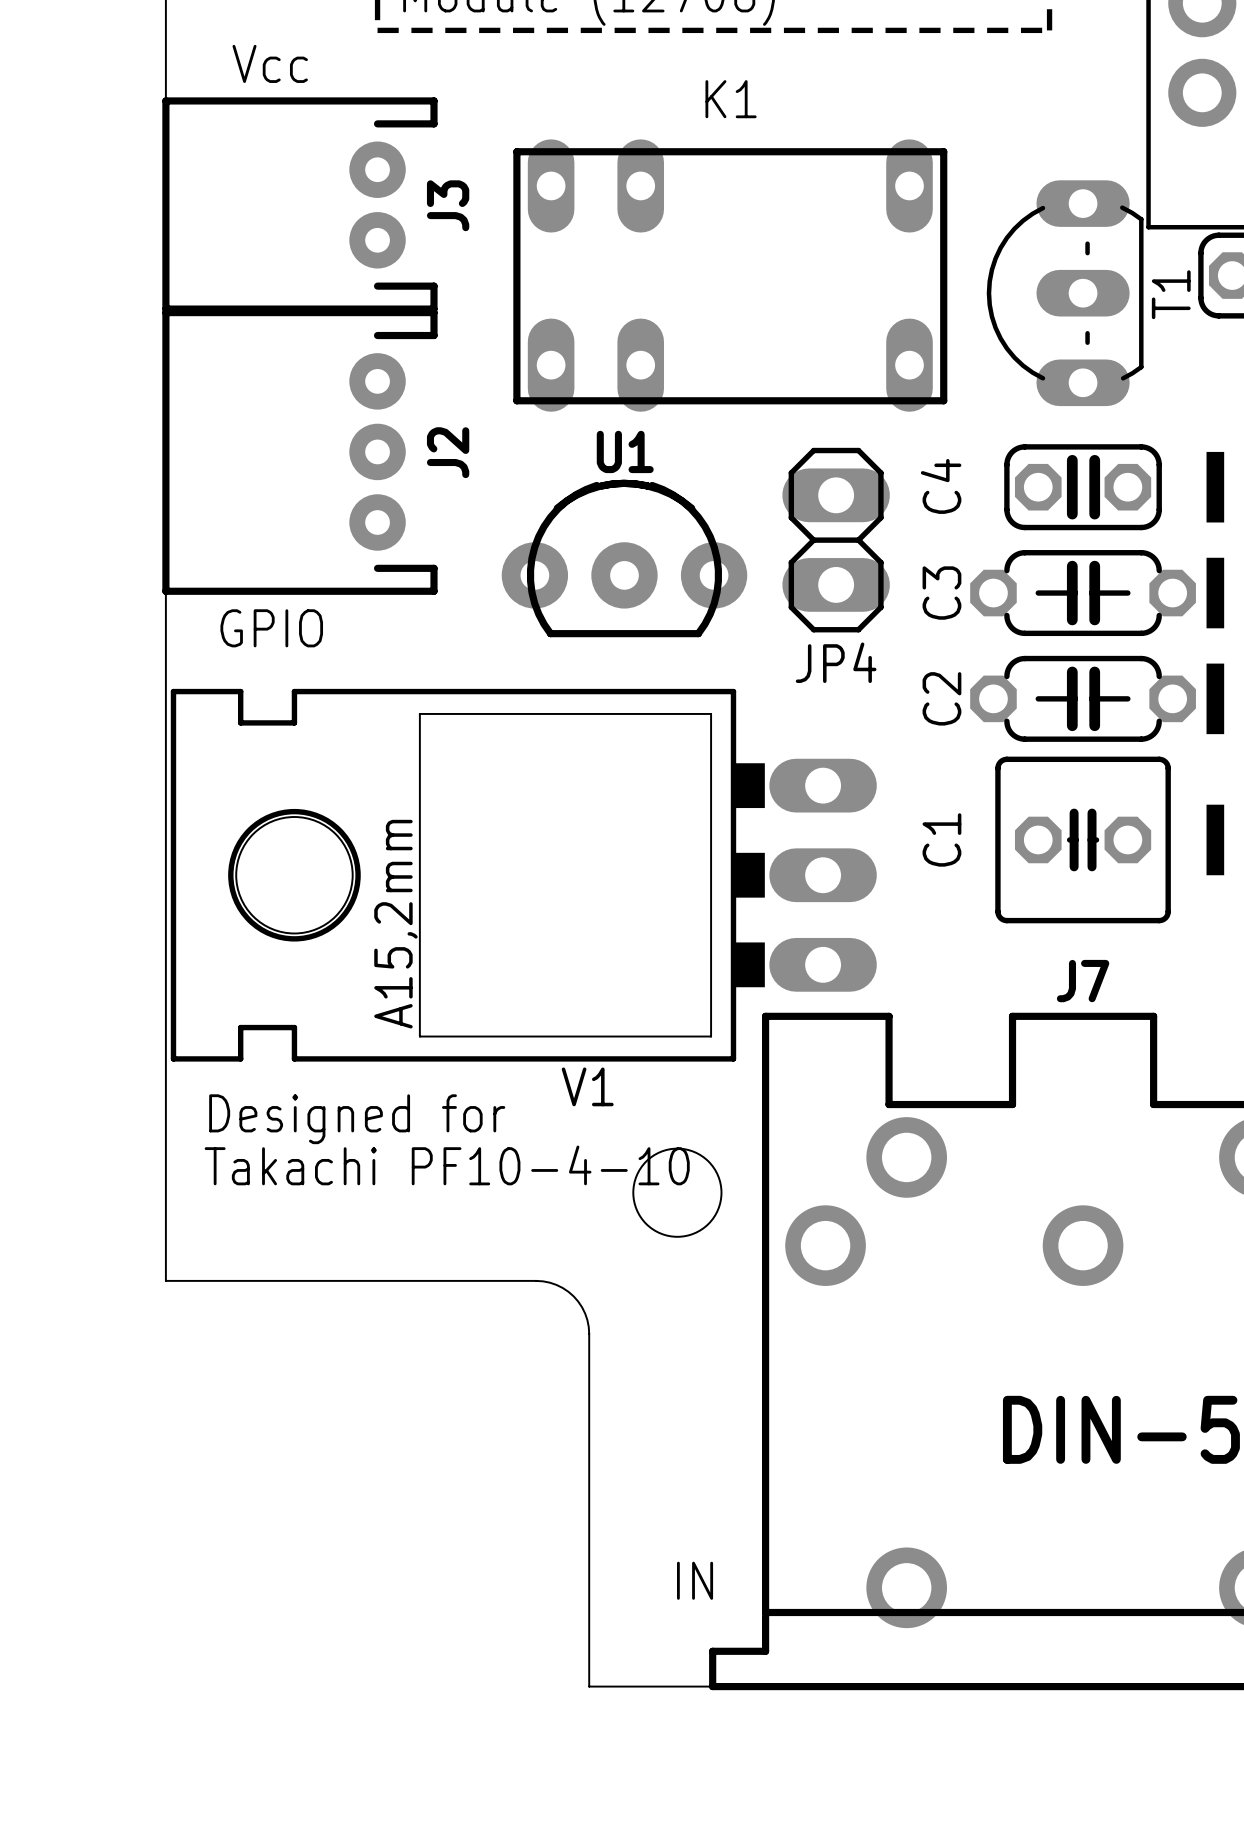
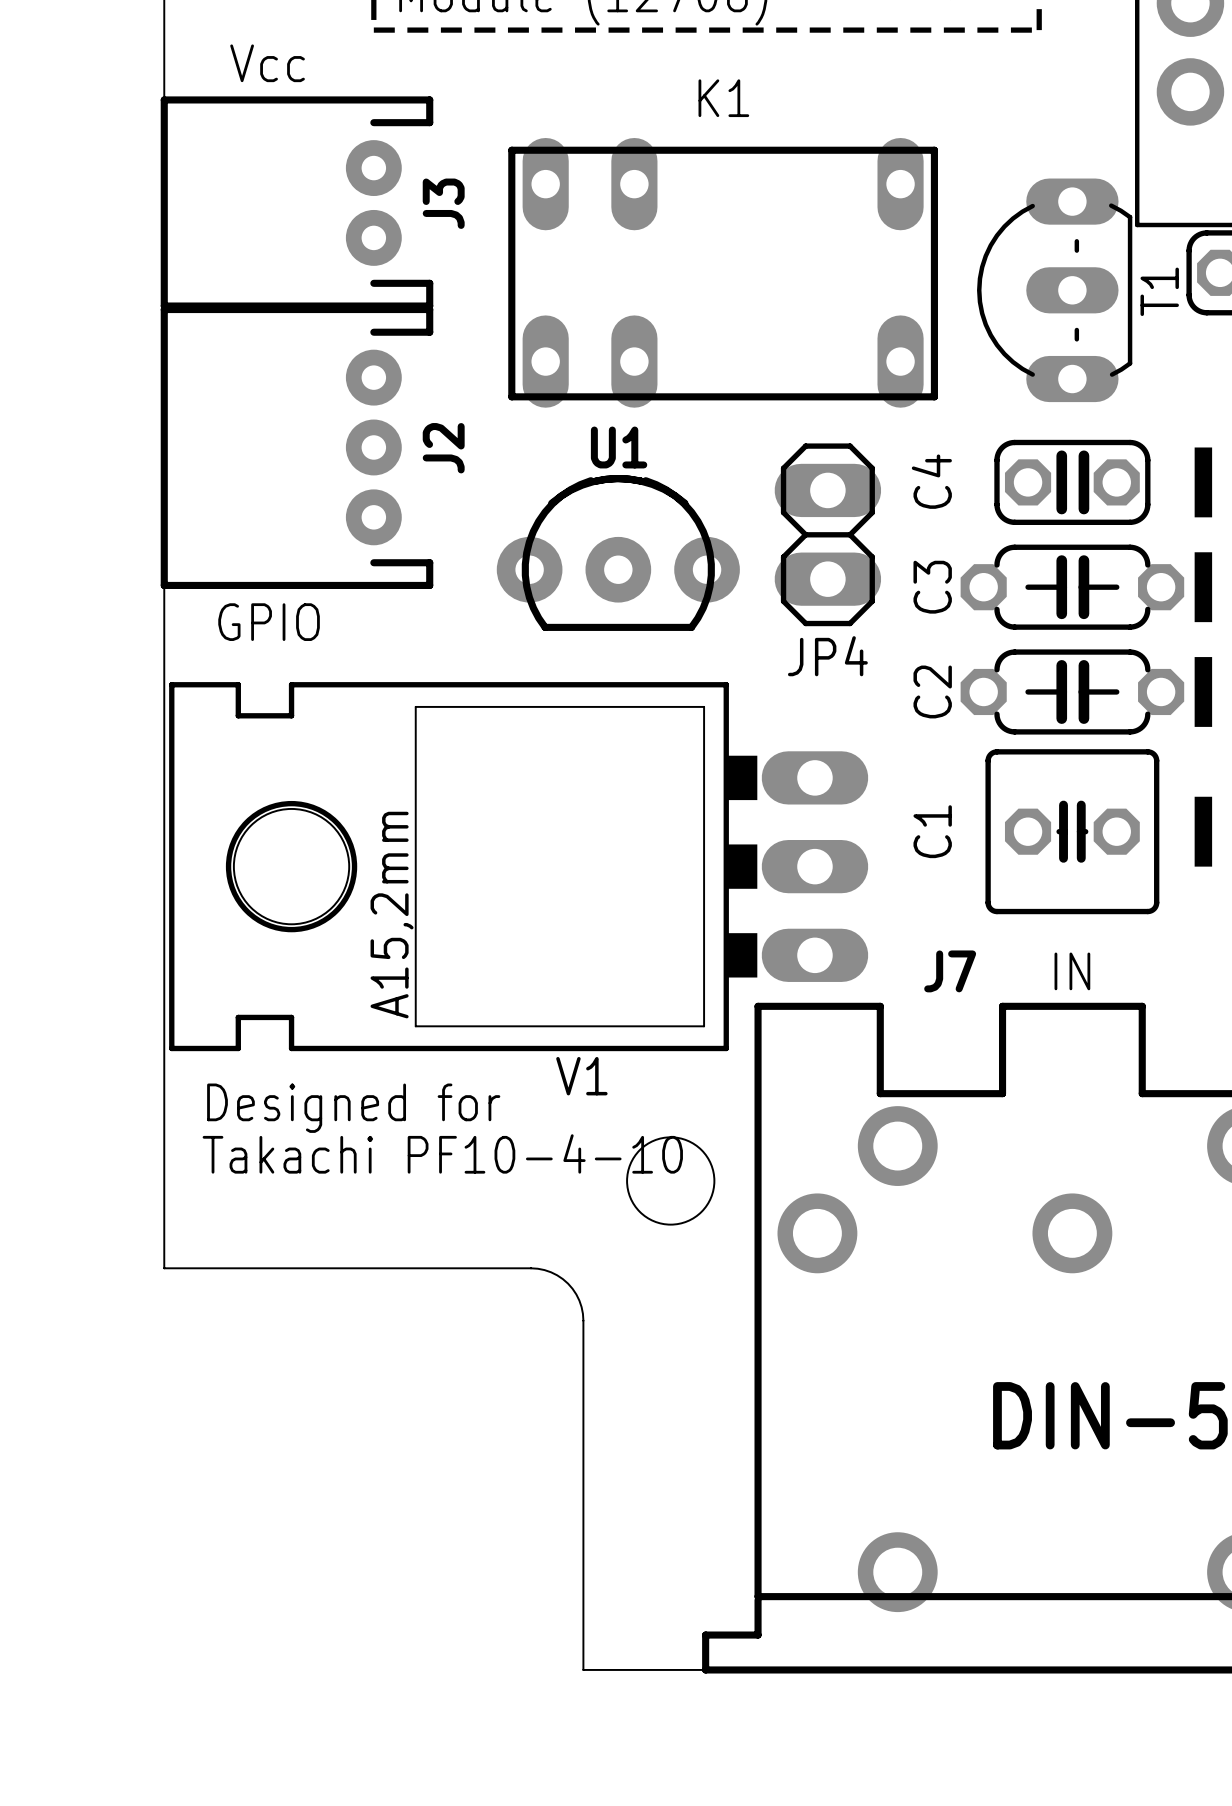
J7 name position: J7 (1083, 981) -> J7 (950, 971)
text position: IN (695, 1580) -> IN (1072, 971)

